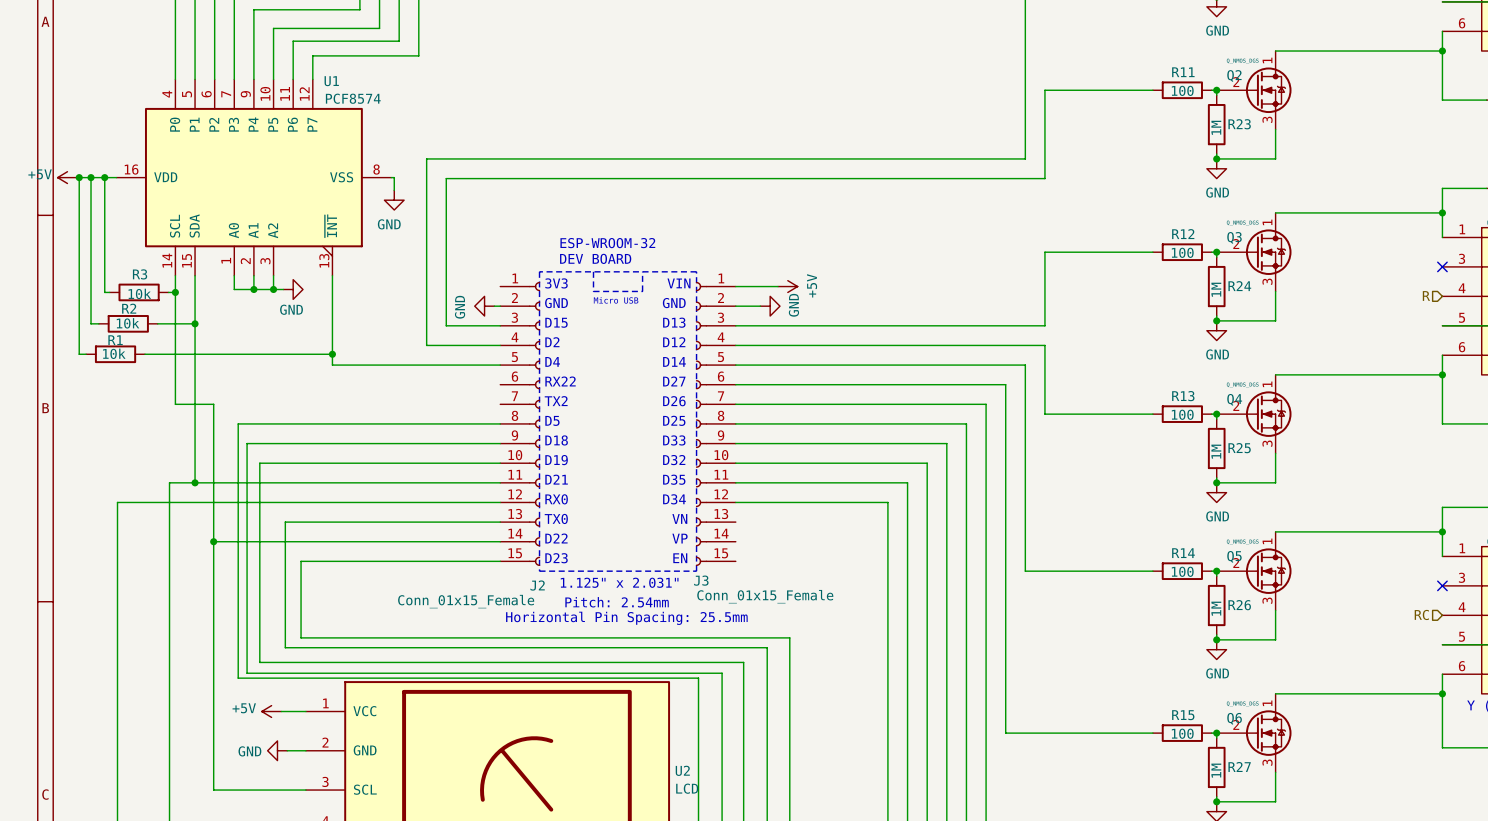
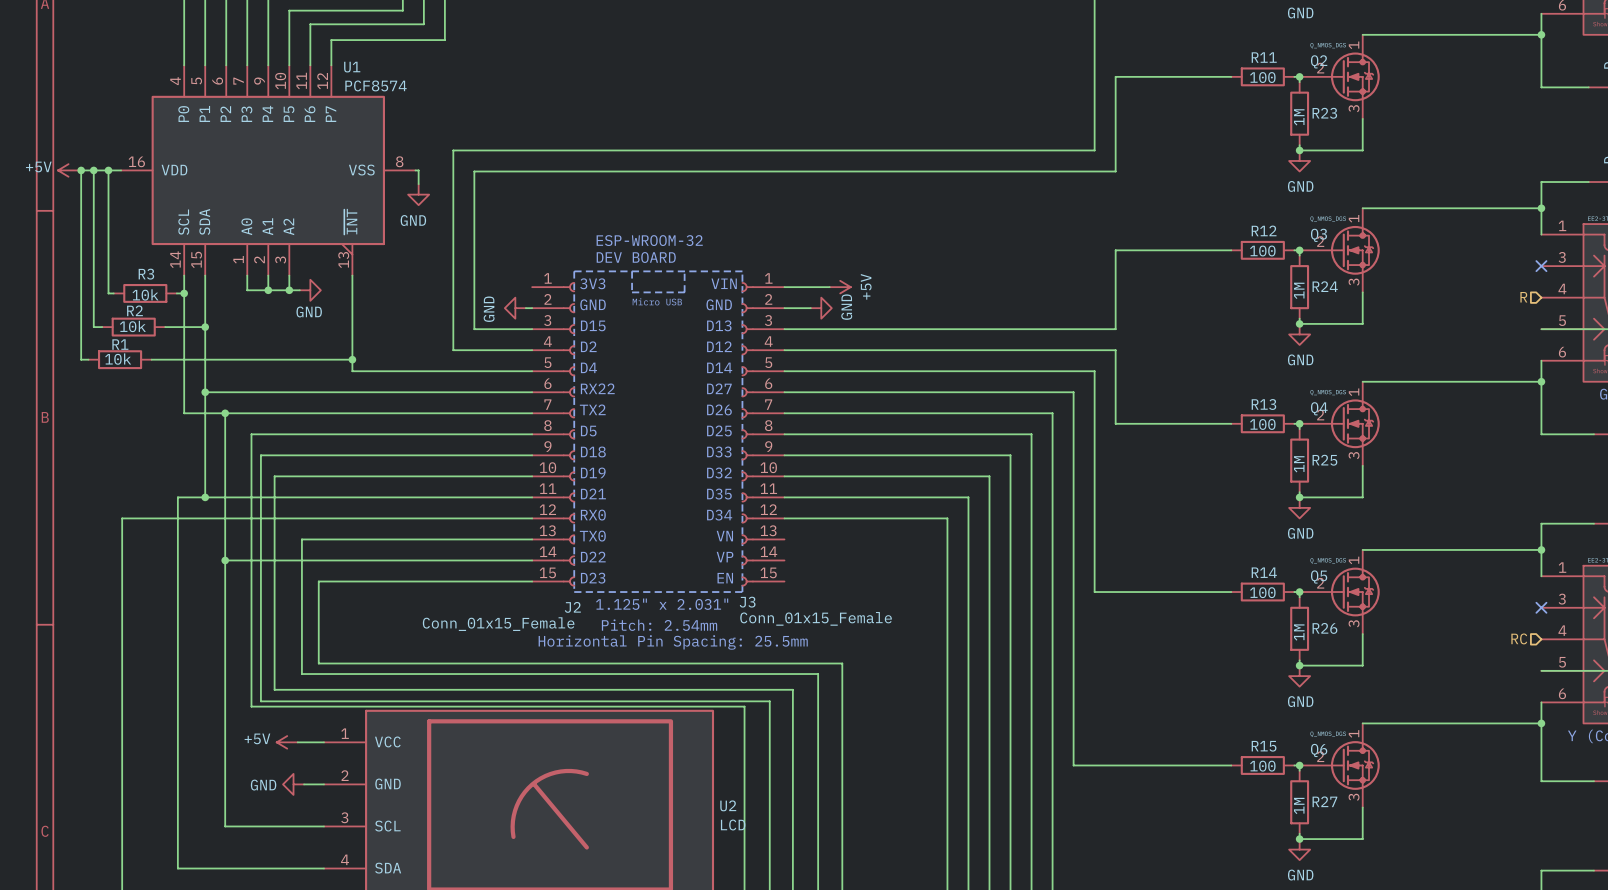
wire: none -> (205, 392) (532, 392)
junction: none -> (205, 392)
wire: none -> (225, 413) (532, 413)
junction: none -> (225, 413)

